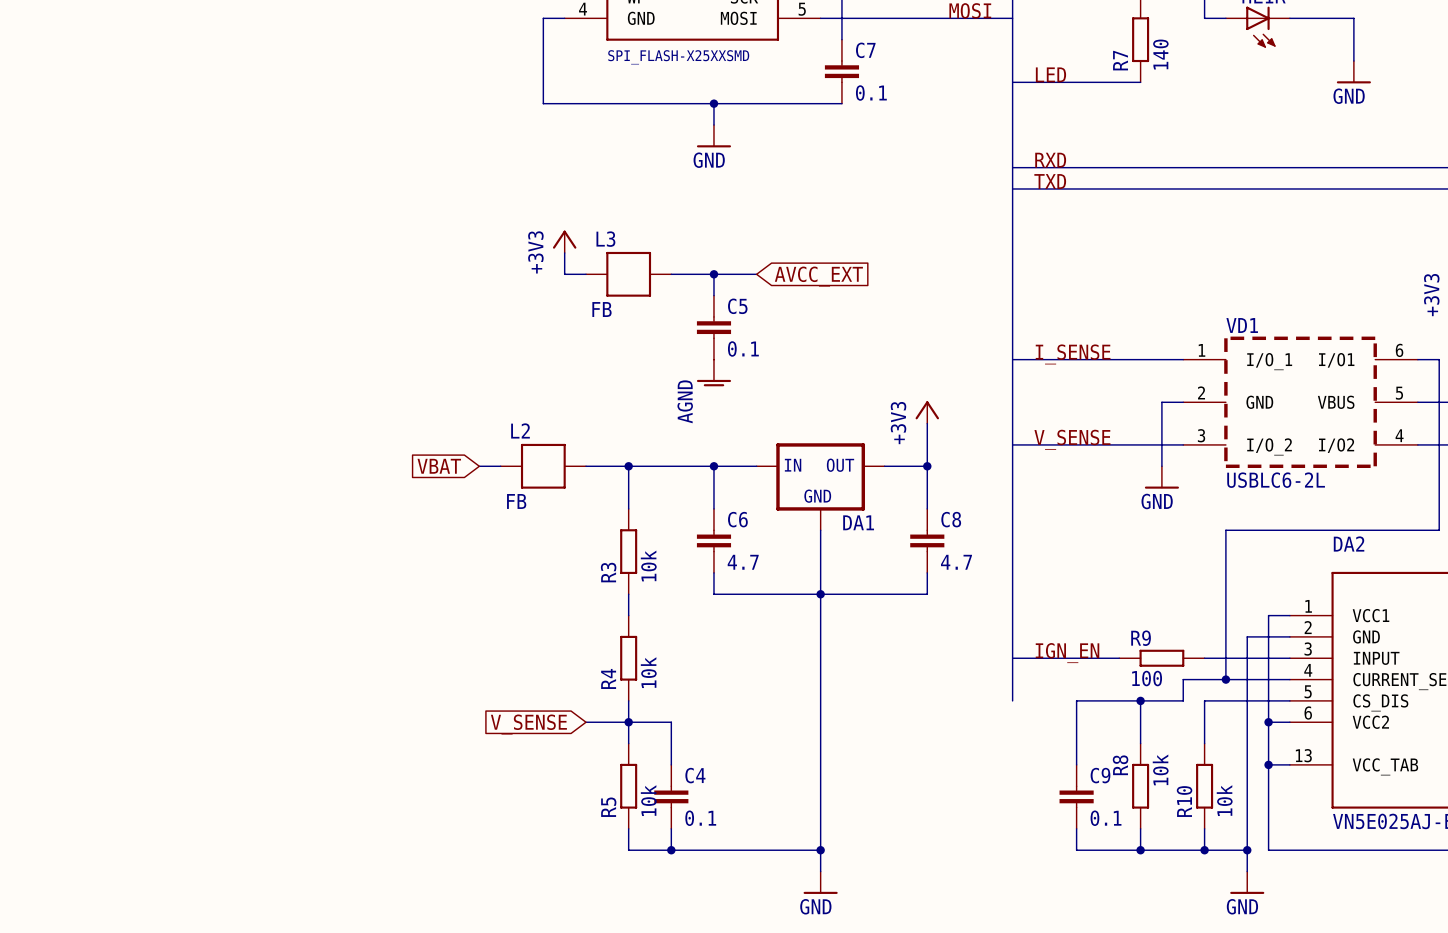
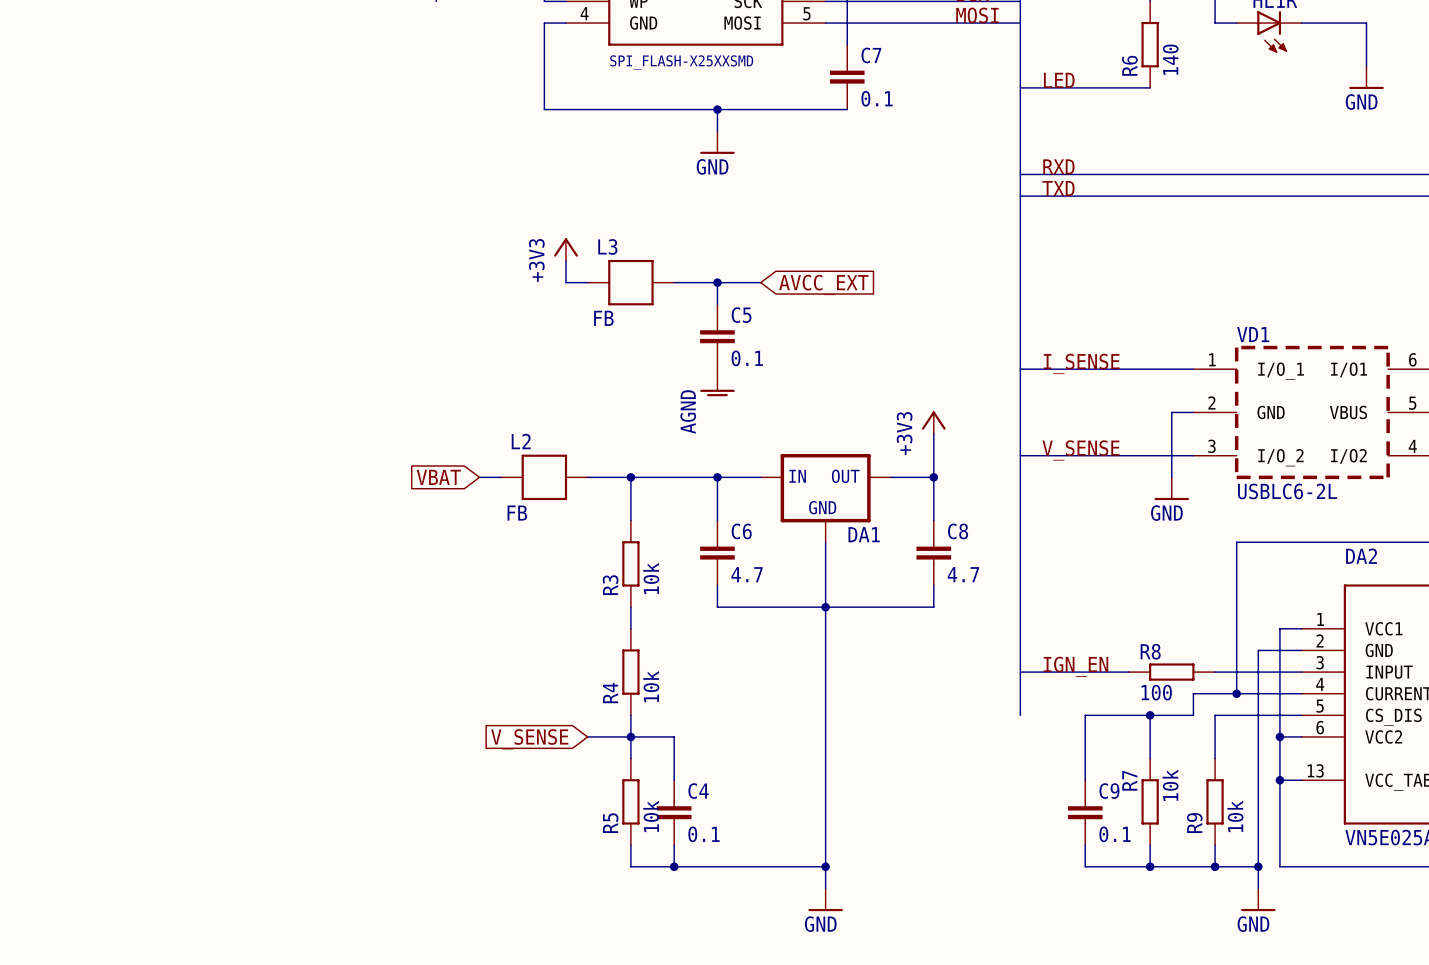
R7 name: R7 (1120, 60) -> R6 (1129, 65)
R9 name: R9 (1141, 638) -> R8 (1150, 651)
R8 name: R8 (1120, 765) -> R7 (1129, 780)
R10 name: R10 (1184, 801) -> R9 (1194, 823)

